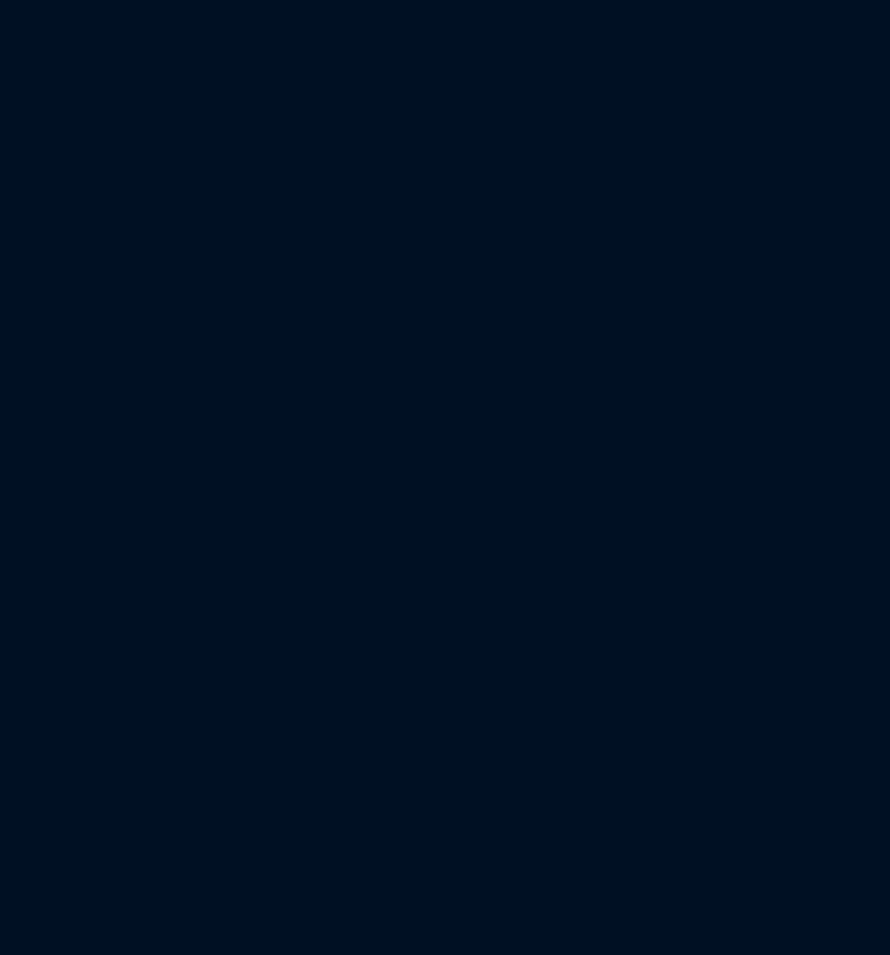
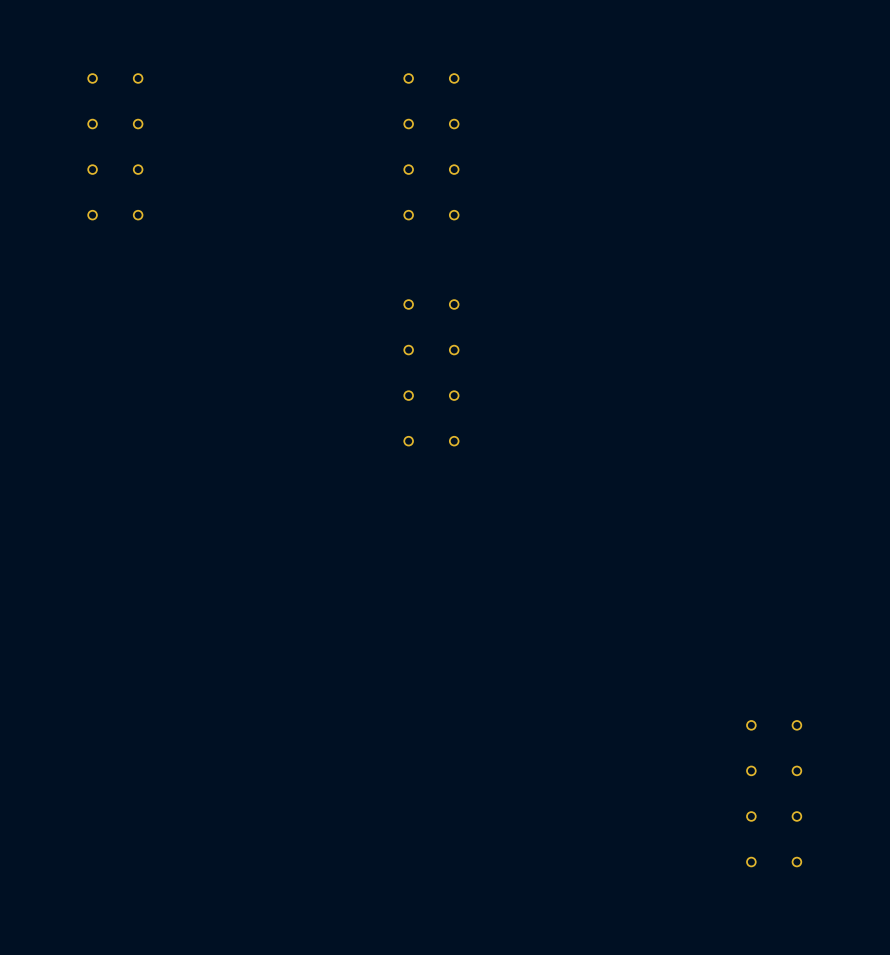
part: none -> (115, 146)
part: none -> (431, 146)
part: none -> (431, 372)
part: none -> (774, 793)

